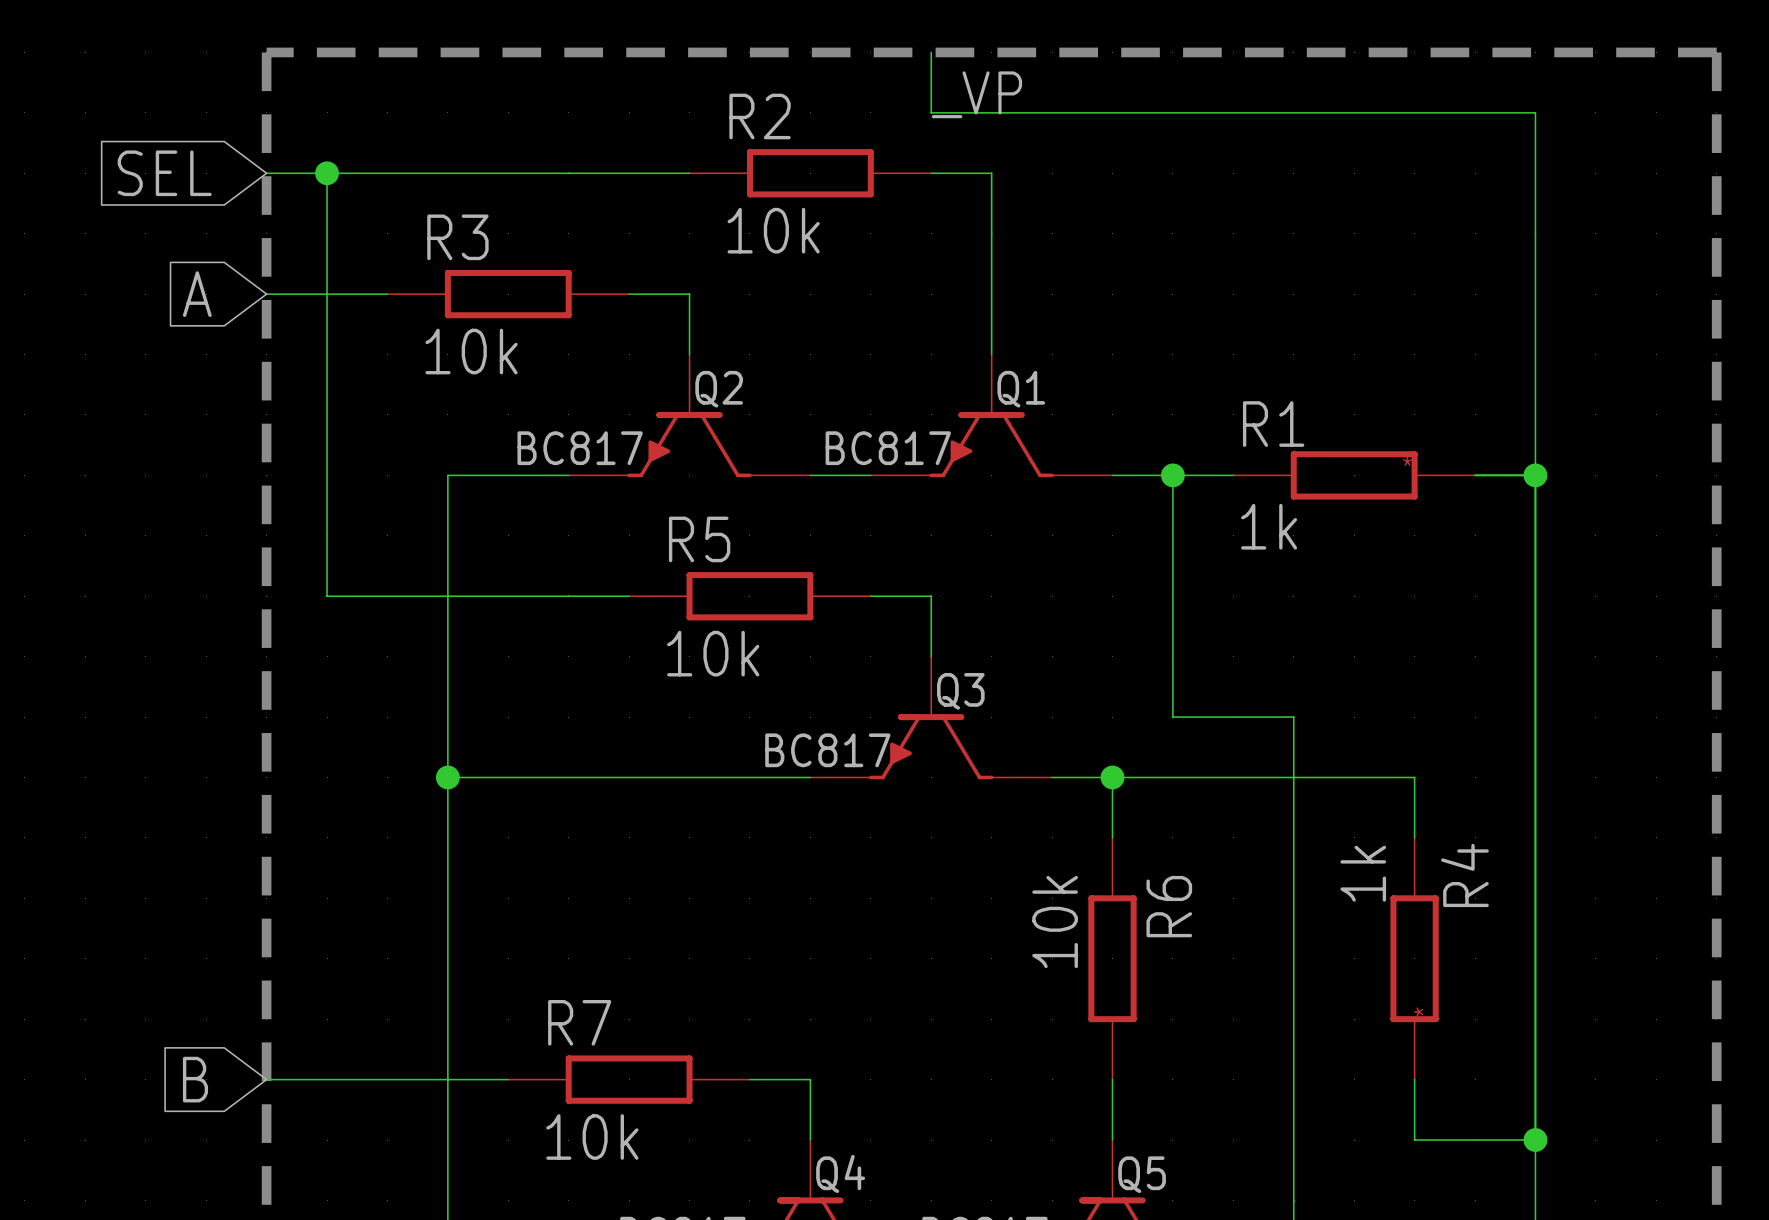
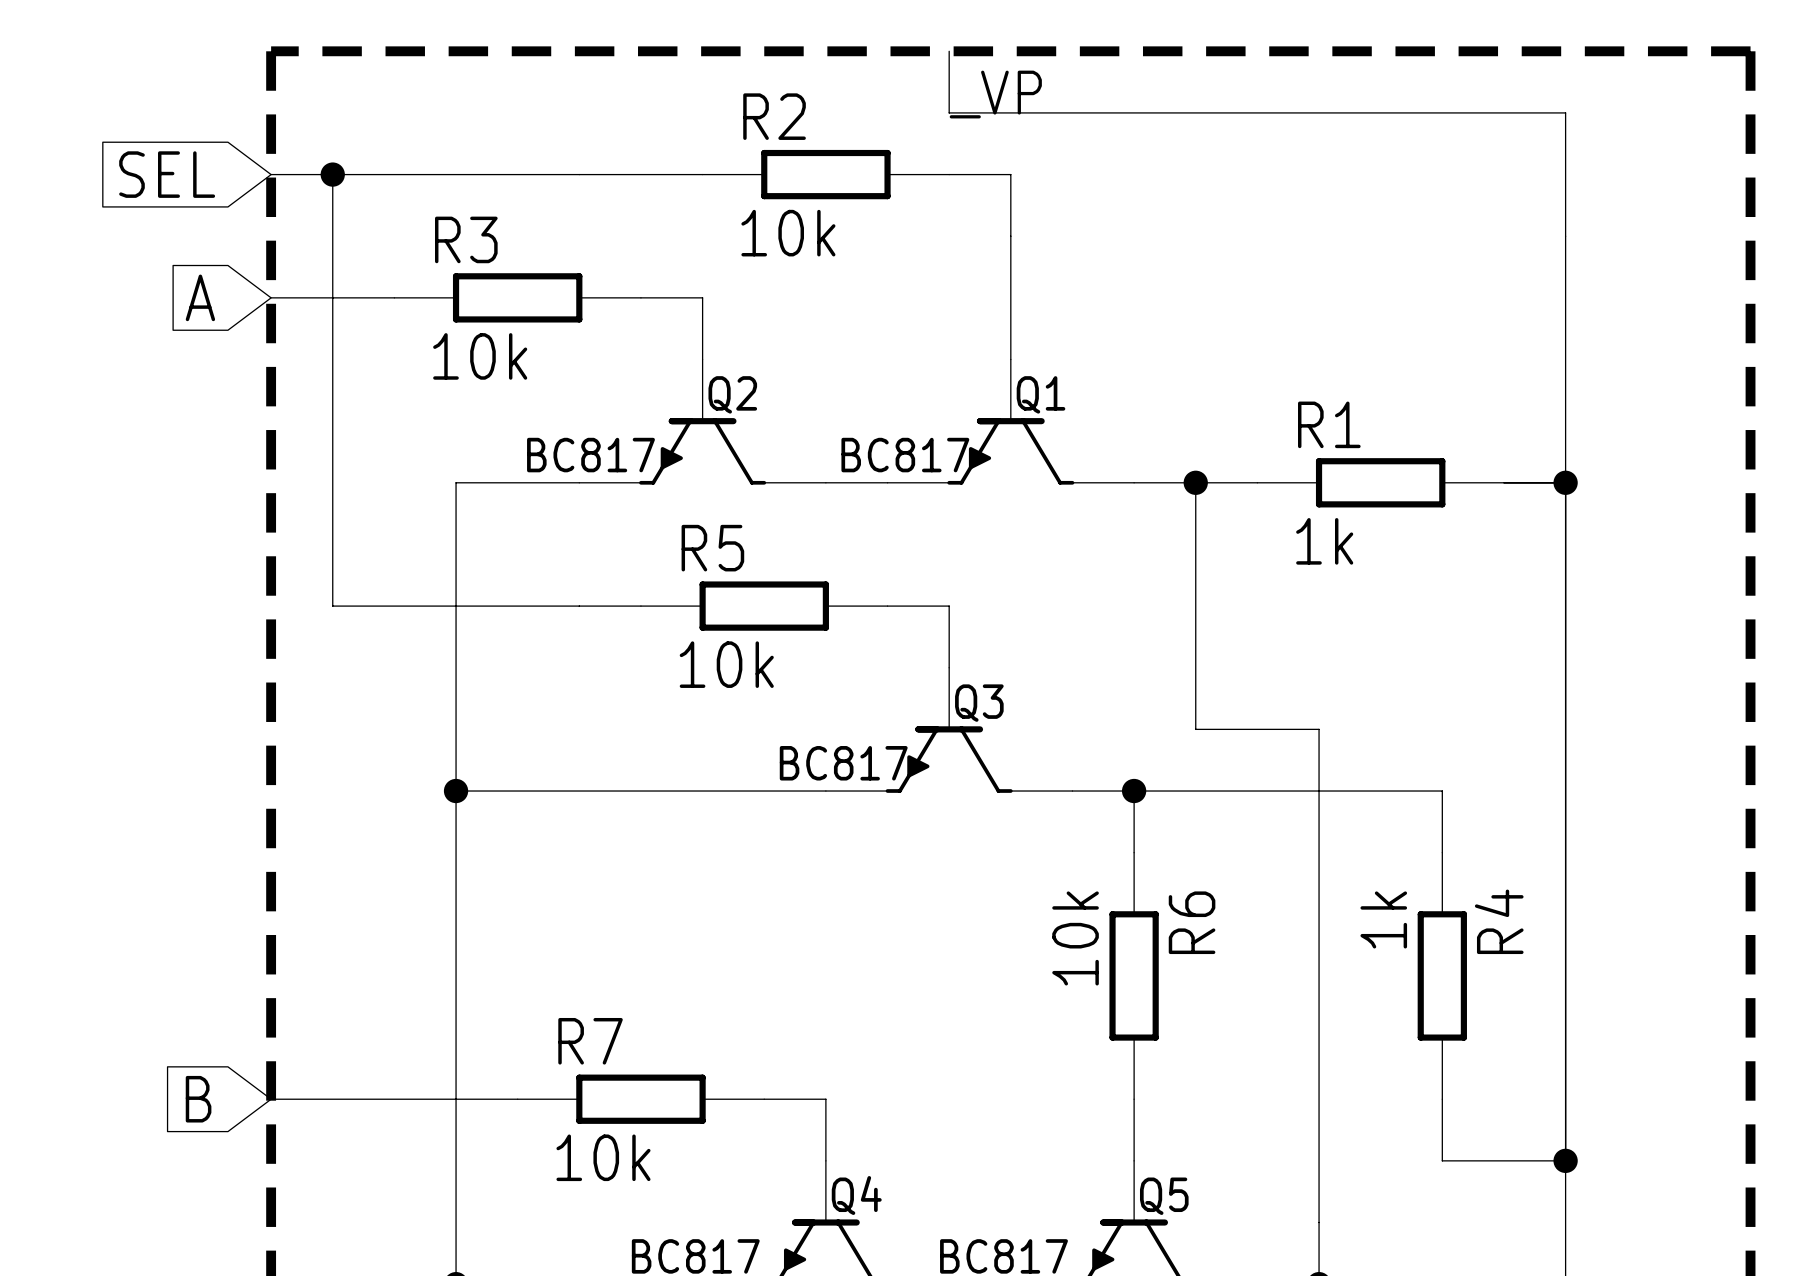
R1 name position: R1 (1273, 424) -> R1 (1329, 424)
R1 text: * (1407, 461) -> none
R1 value position: 1k (1269, 526) -> 1k (1324, 541)
R4 value position: 1k (1363, 873) -> 1k (1383, 919)
R4 name position: R4 (1464, 875) -> R4 (1499, 921)
R4 text: * (1418, 1012) -> none

